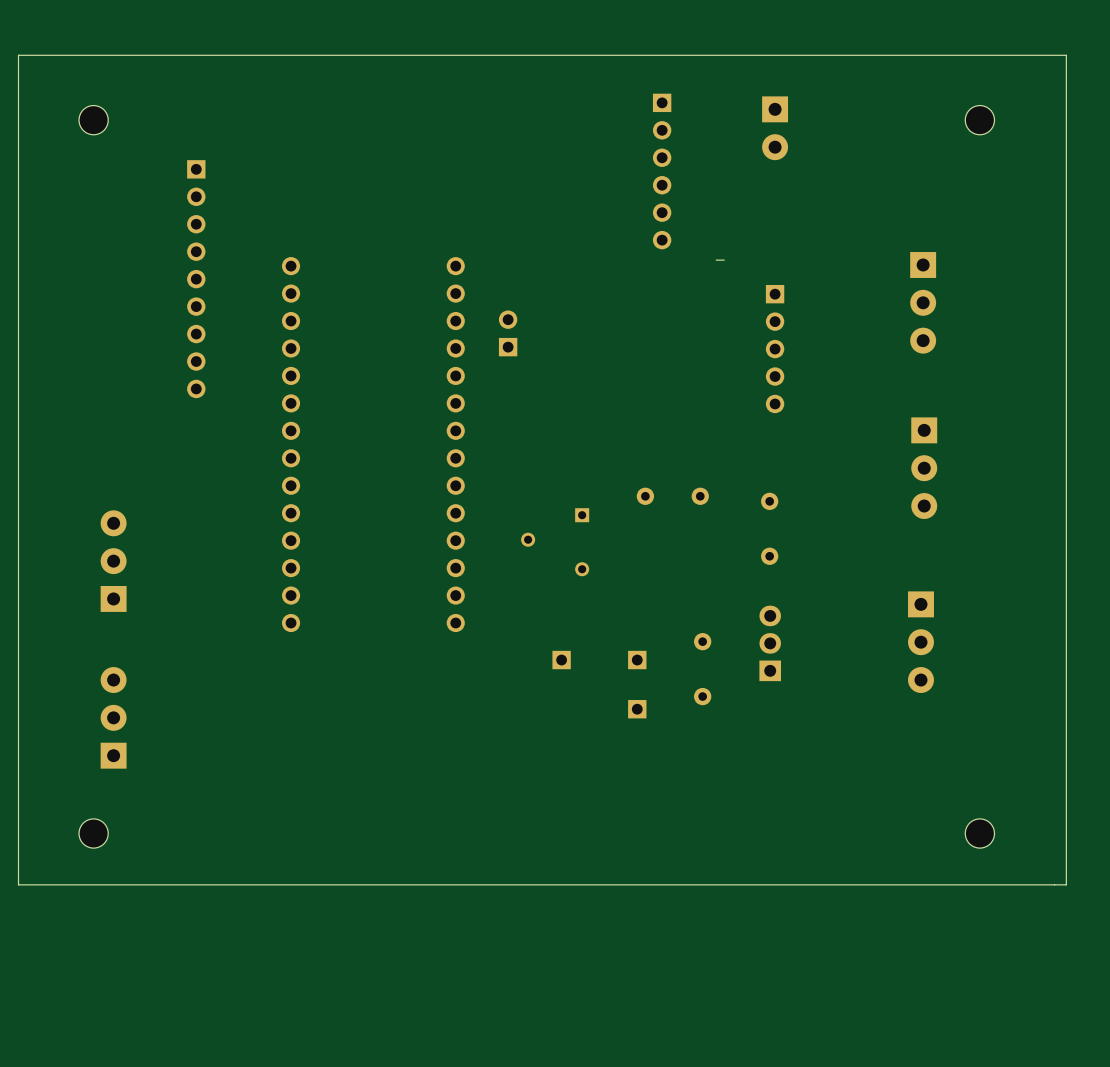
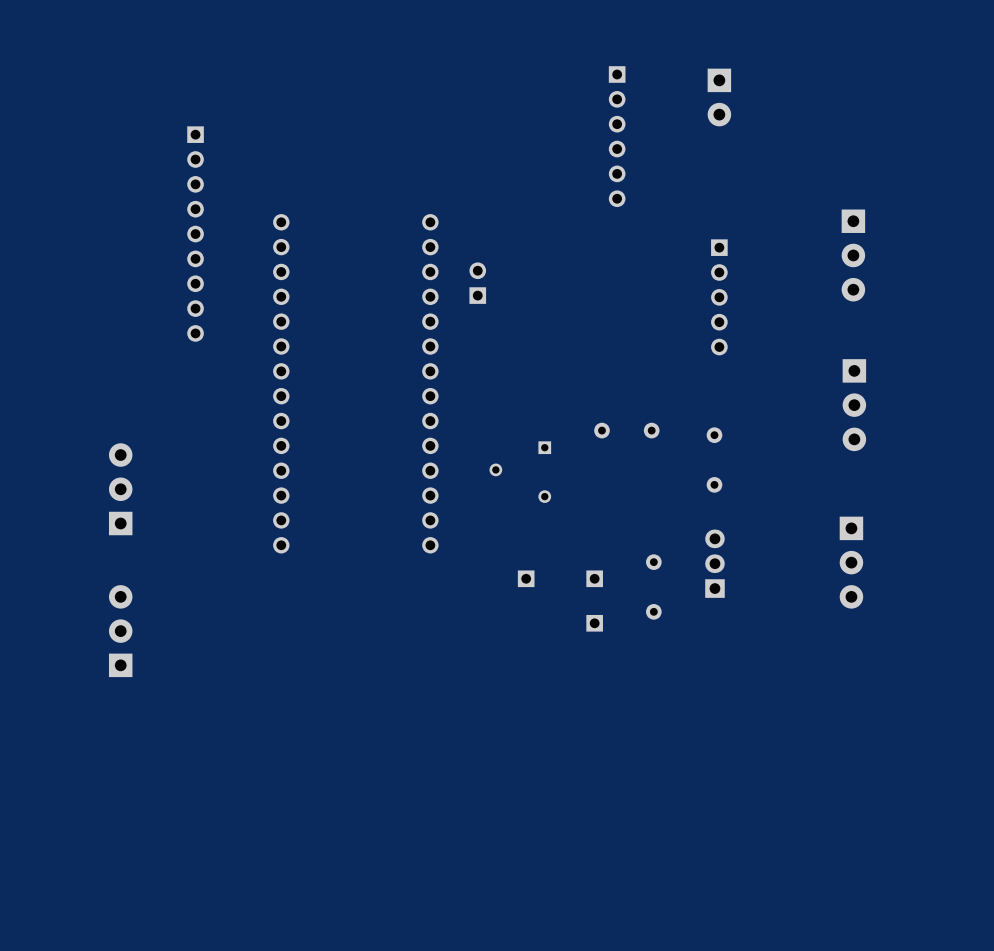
board edge: (1066, 55) (18, 55) (18, 884) (1066, 884) (1066, 55) -> none
part: (93, 120) -> none
part: (979, 120) -> none
board edge: (724, 260) (716, 260) -> none
part: (93, 833) -> none
part: (979, 833) -> none

